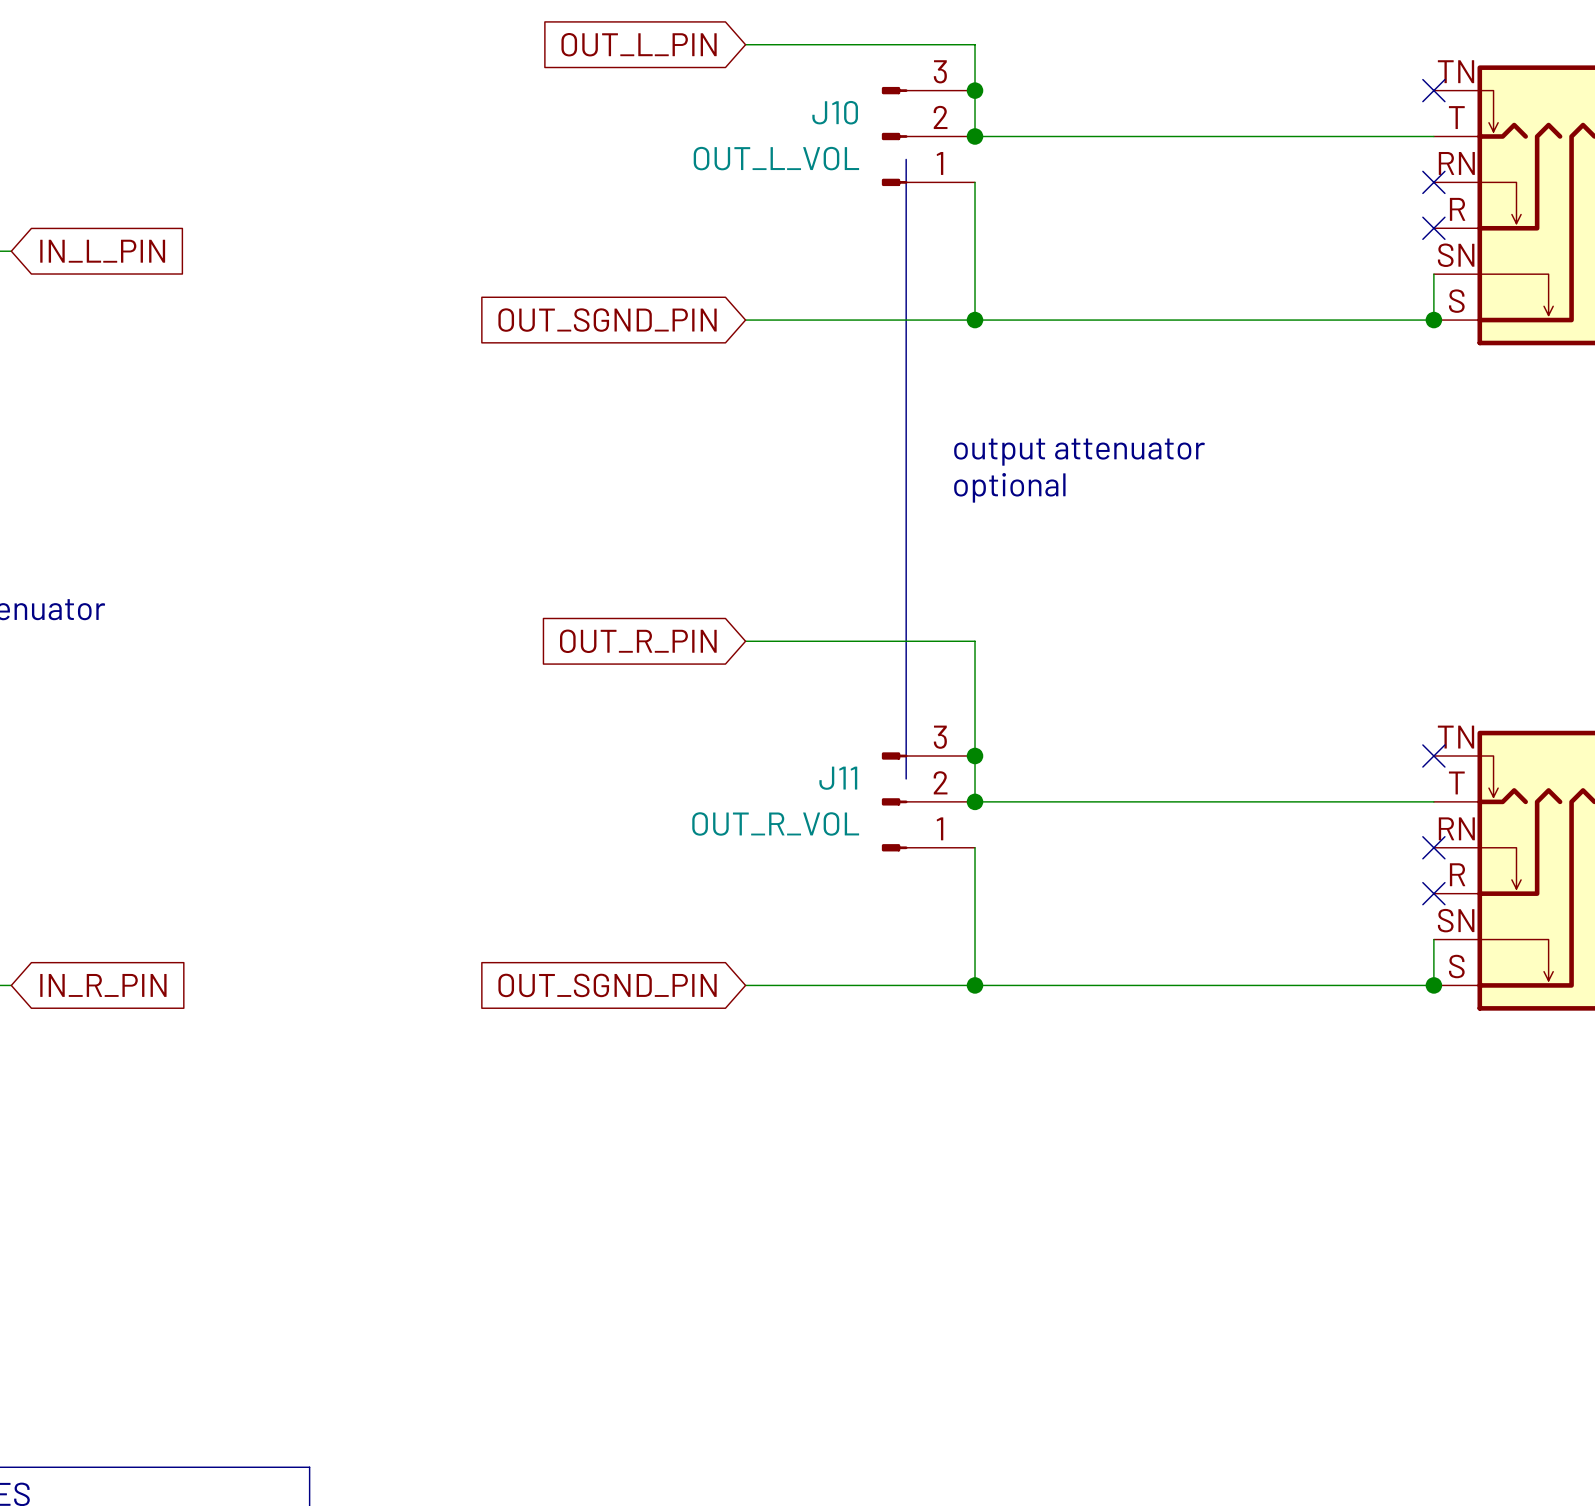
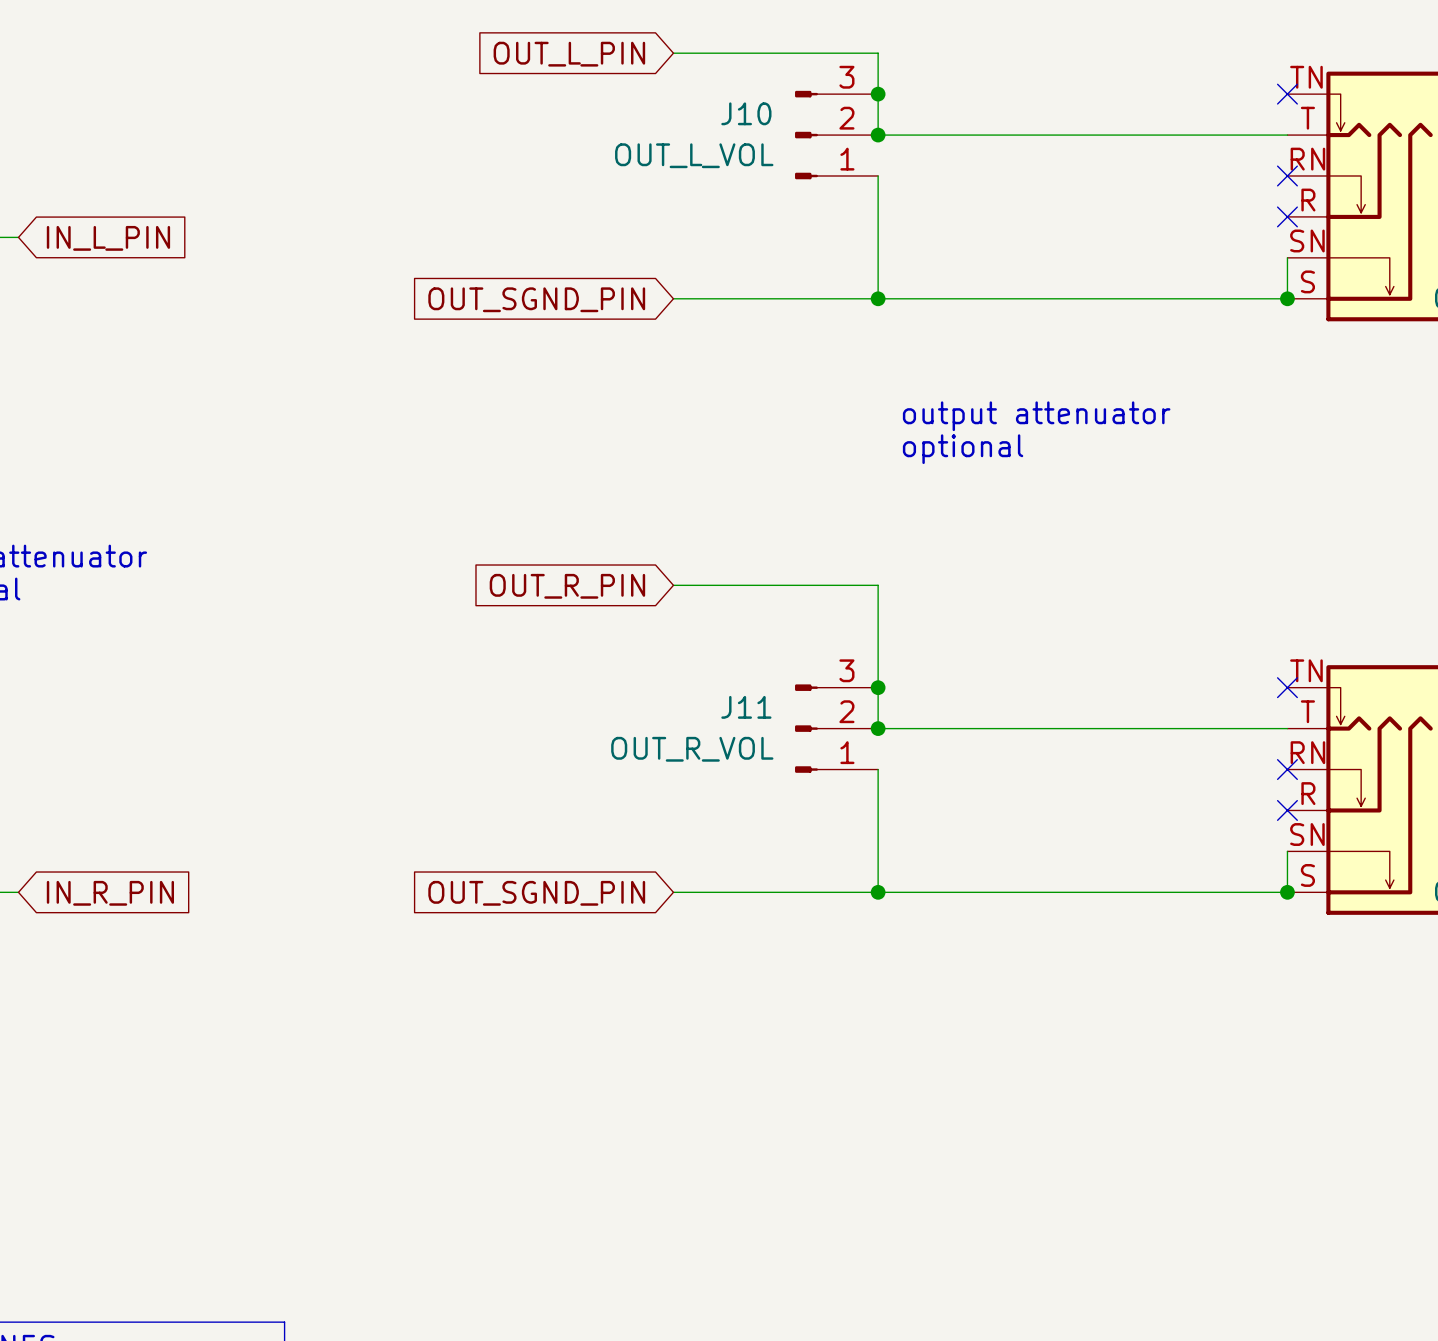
line: (906, 159) (906, 778) -> none
text position: output attenuator (1079, 452) -> output attenuator (1036, 416)
text position: optional (1009, 487) -> optional (963, 449)

